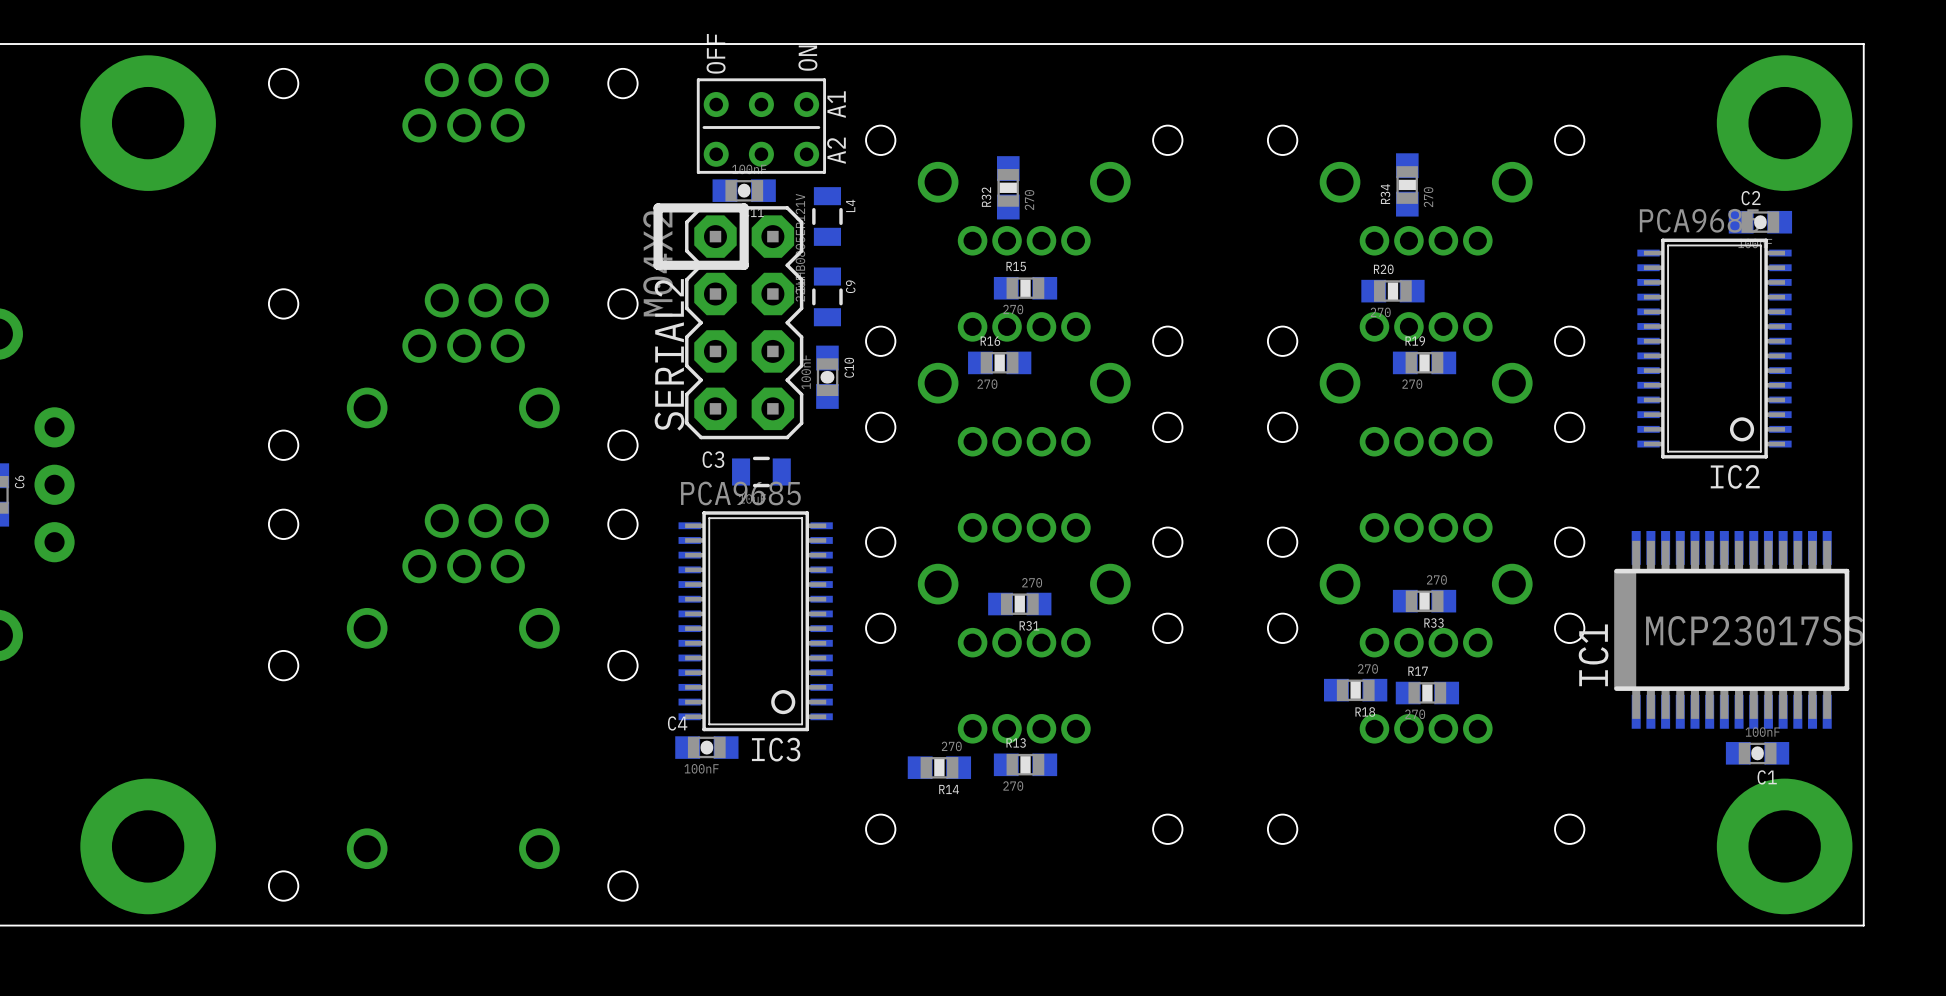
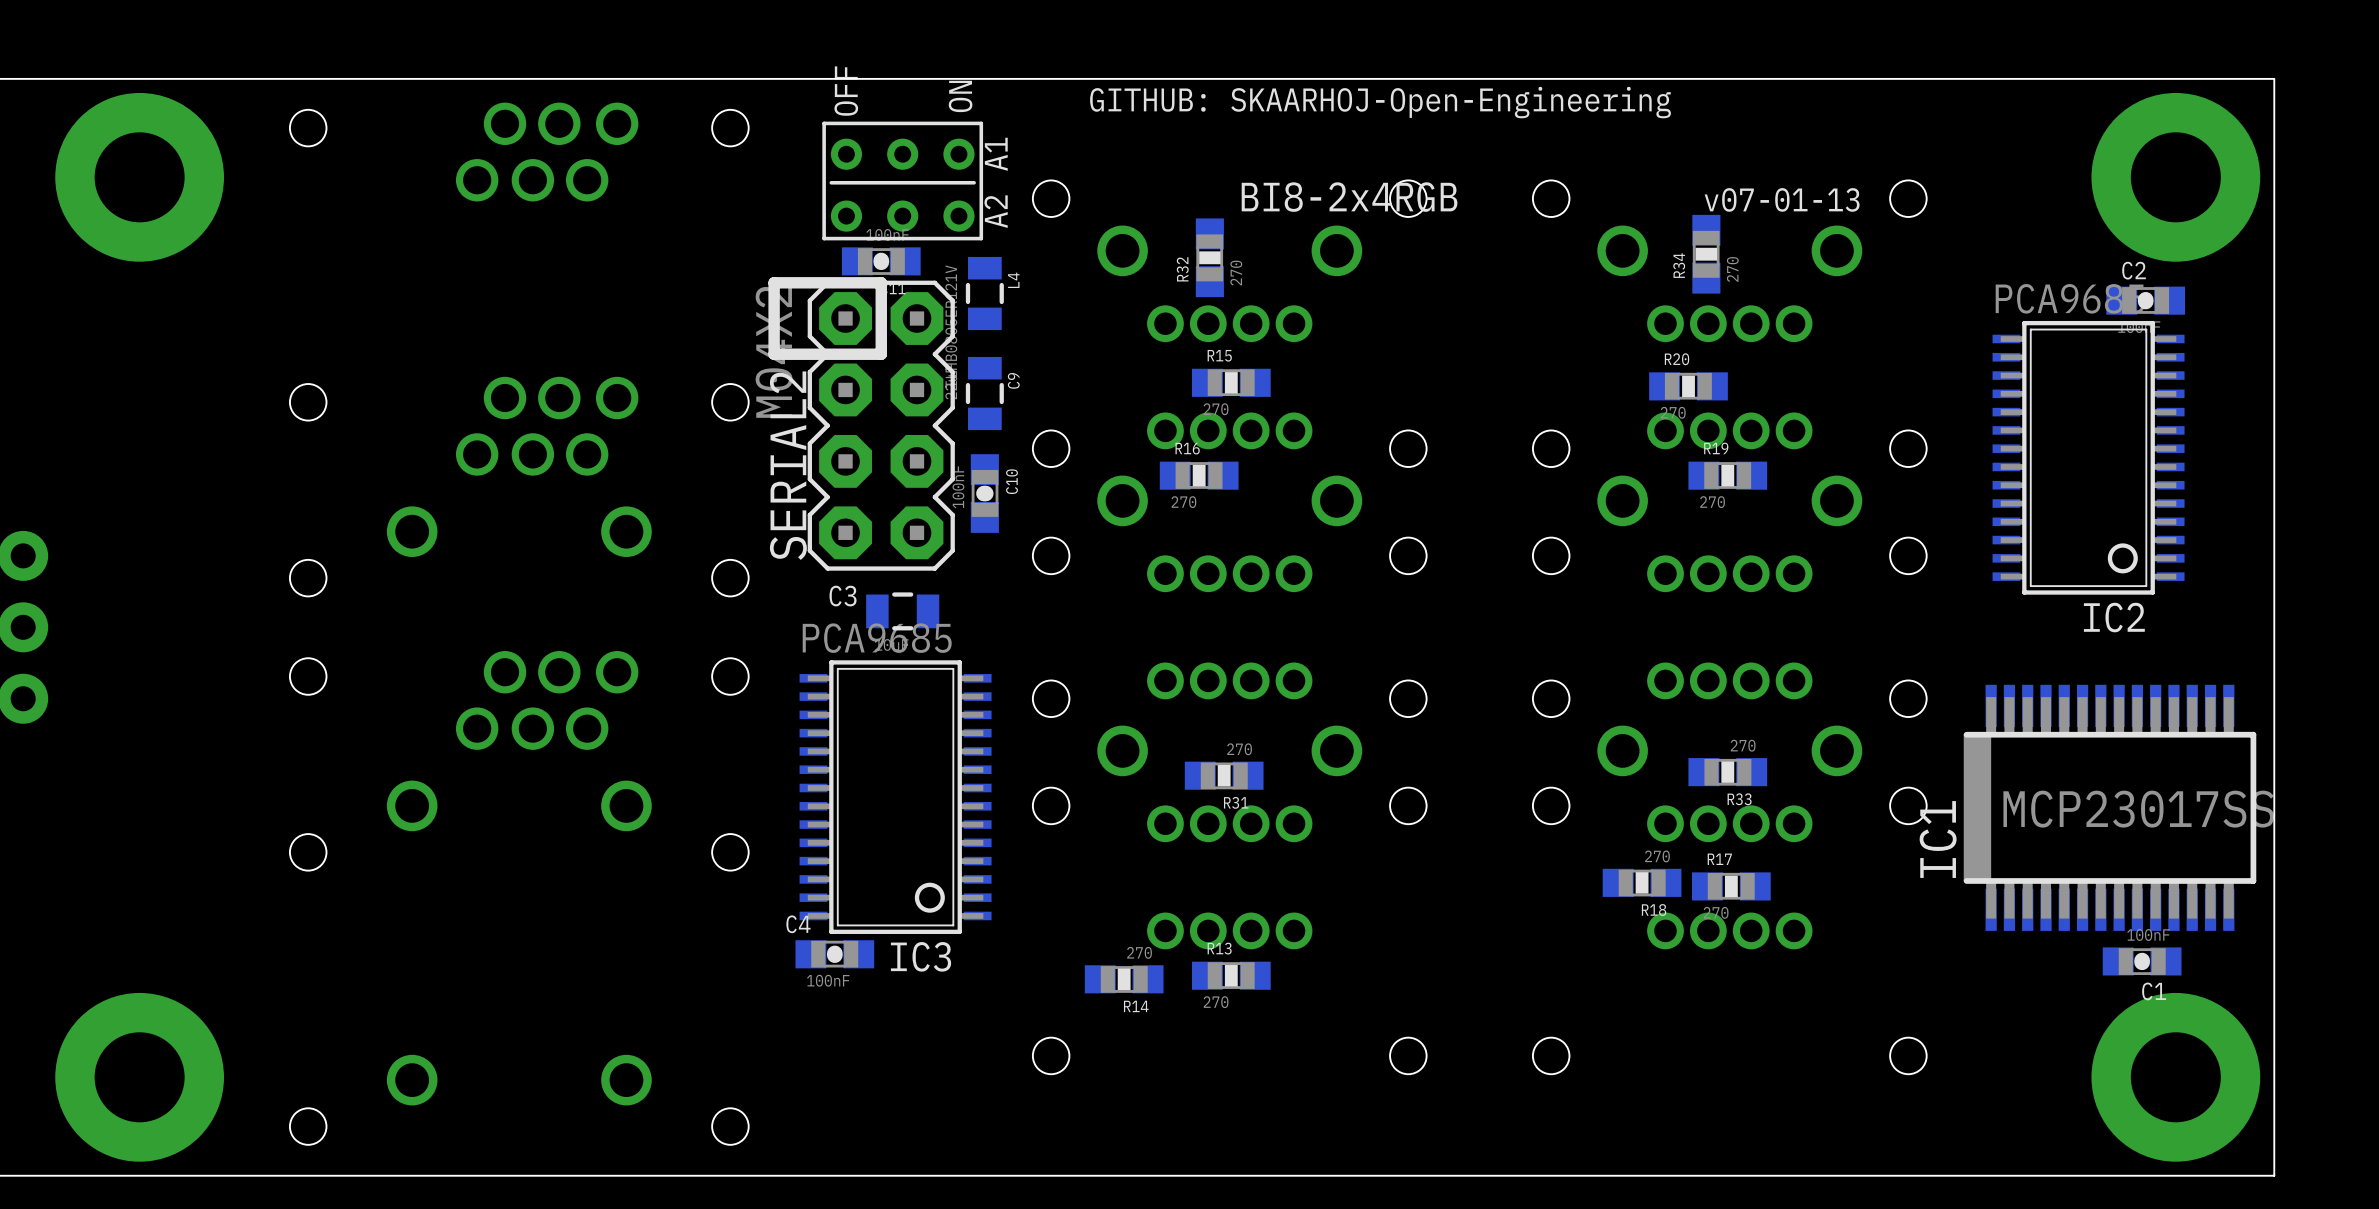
text: none -> GITHUB: SKAARHOJ-Open-Engineering (1380, 102)
text: none -> BI8-2x4RGB (1349, 197)
text: none -> v07-01-13 (1782, 199)

